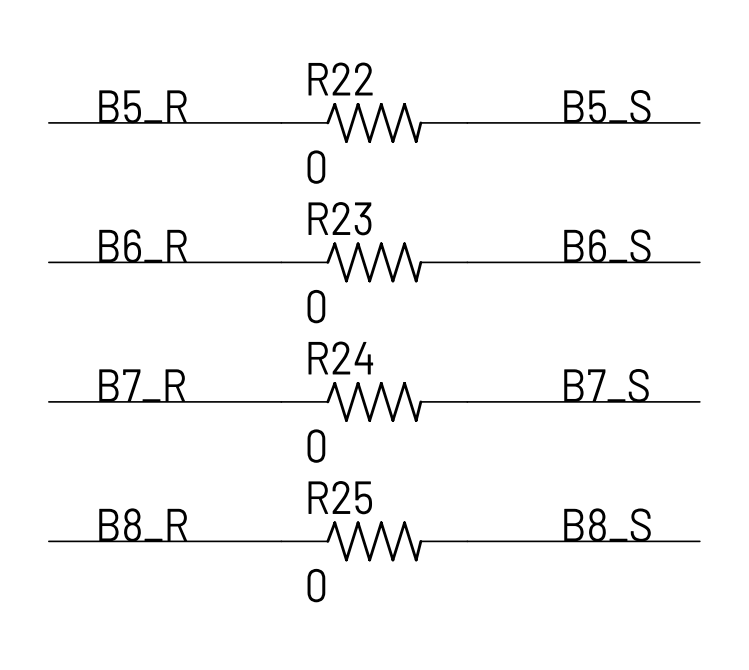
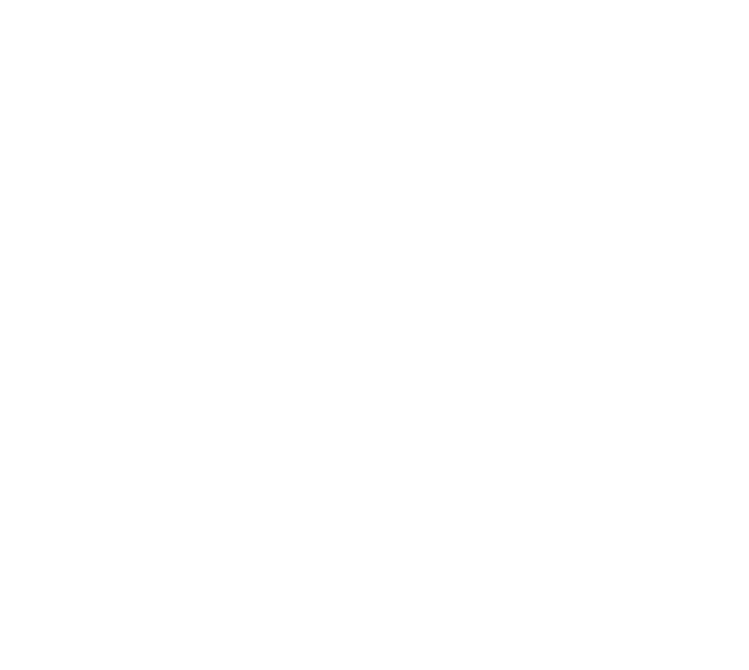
label: B5_R (143, 106) -> none
label: B5_S (607, 106) -> none
wire: (48, 122) (281, 122) -> none
R22: 0 (374, 122) -> none
wire: (467, 122) (699, 122) -> none
label: B6_R (143, 246) -> none
label: B6_S (607, 246) -> none
wire: (48, 262) (281, 262) -> none
R23: 0 (374, 262) -> none
wire: (467, 262) (699, 262) -> none
label: B7_R (142, 385) -> none
label: B7_S (606, 385) -> none
wire: (48, 401) (281, 401) -> none
R24: 0 (374, 401) -> none
wire: (467, 401) (699, 401) -> none
label: B8_R (143, 525) -> none
label: B8_S (607, 525) -> none
wire: (48, 541) (281, 541) -> none
R25: 0 (374, 541) -> none
wire: (467, 541) (699, 541) -> none

